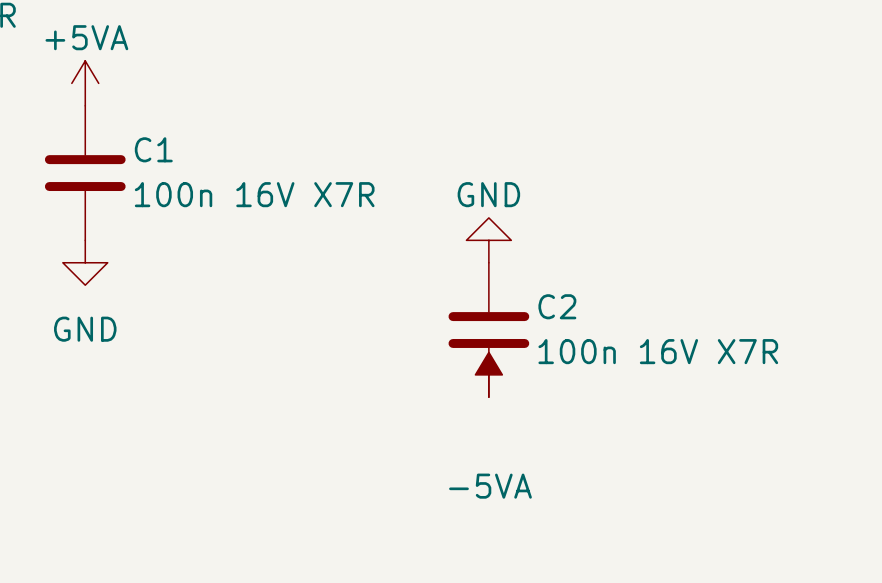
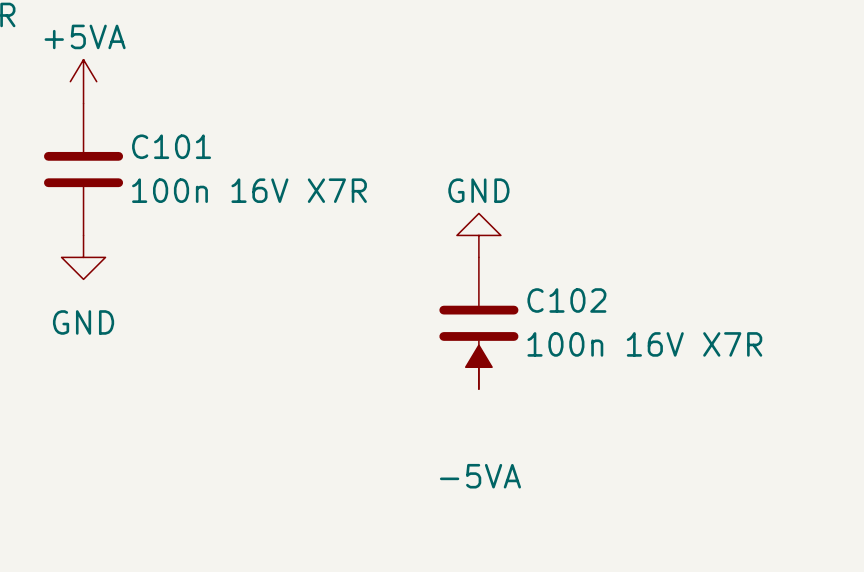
C1 name: C1 (153, 149) -> C101 (171, 146)
C2 name: C2 (557, 306) -> C102 (566, 300)

